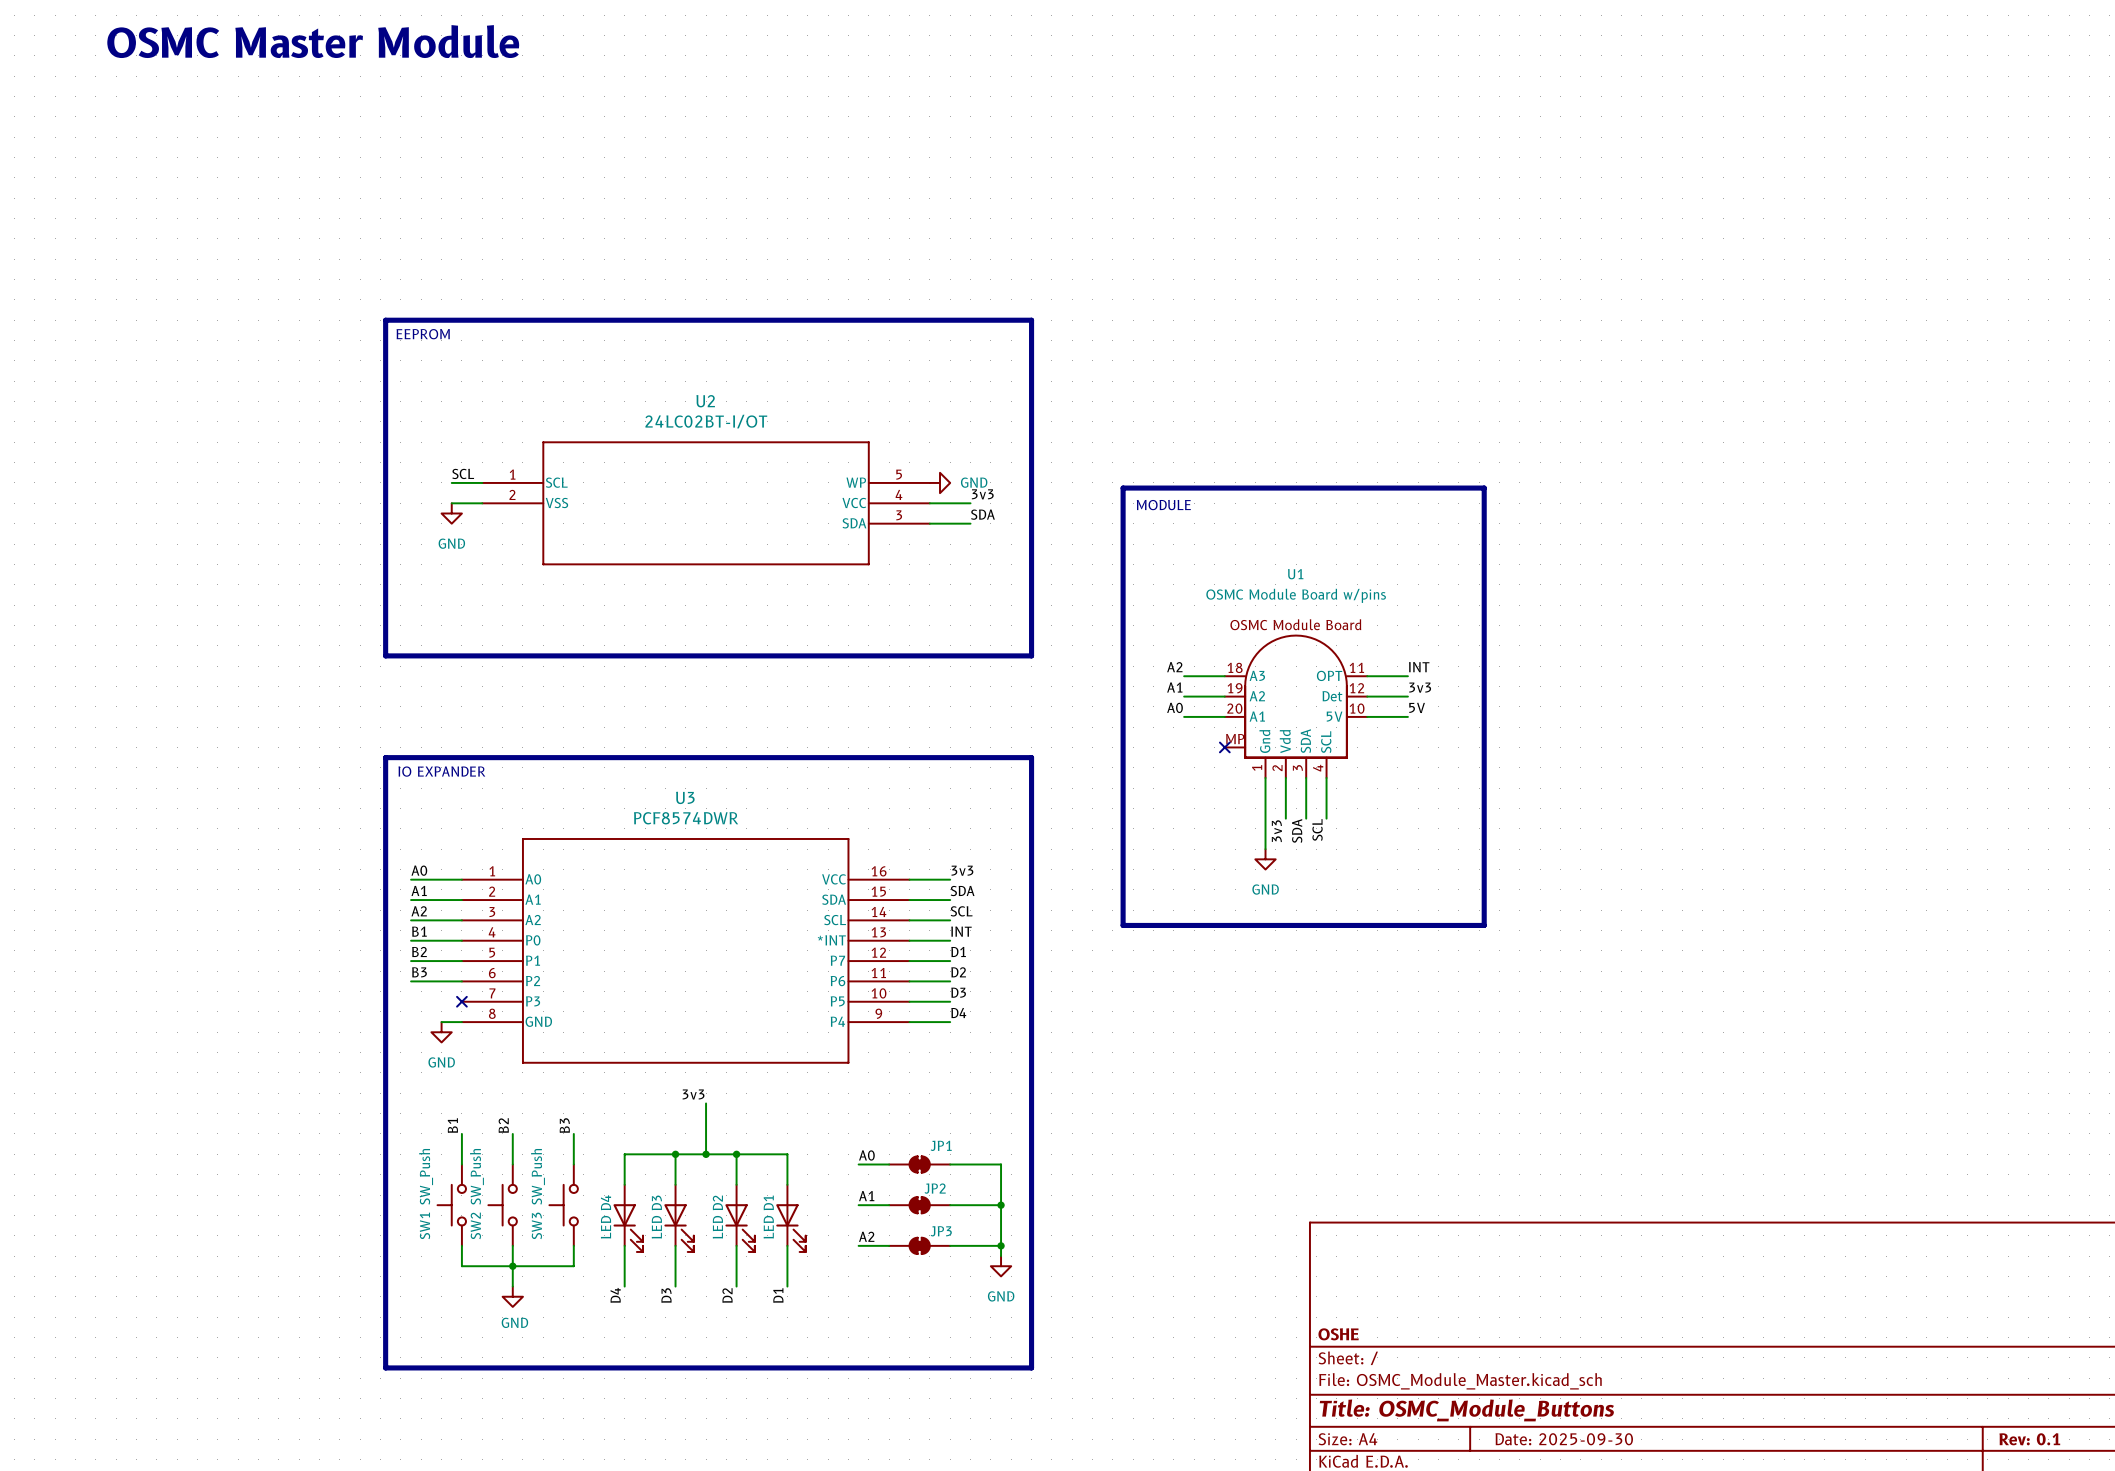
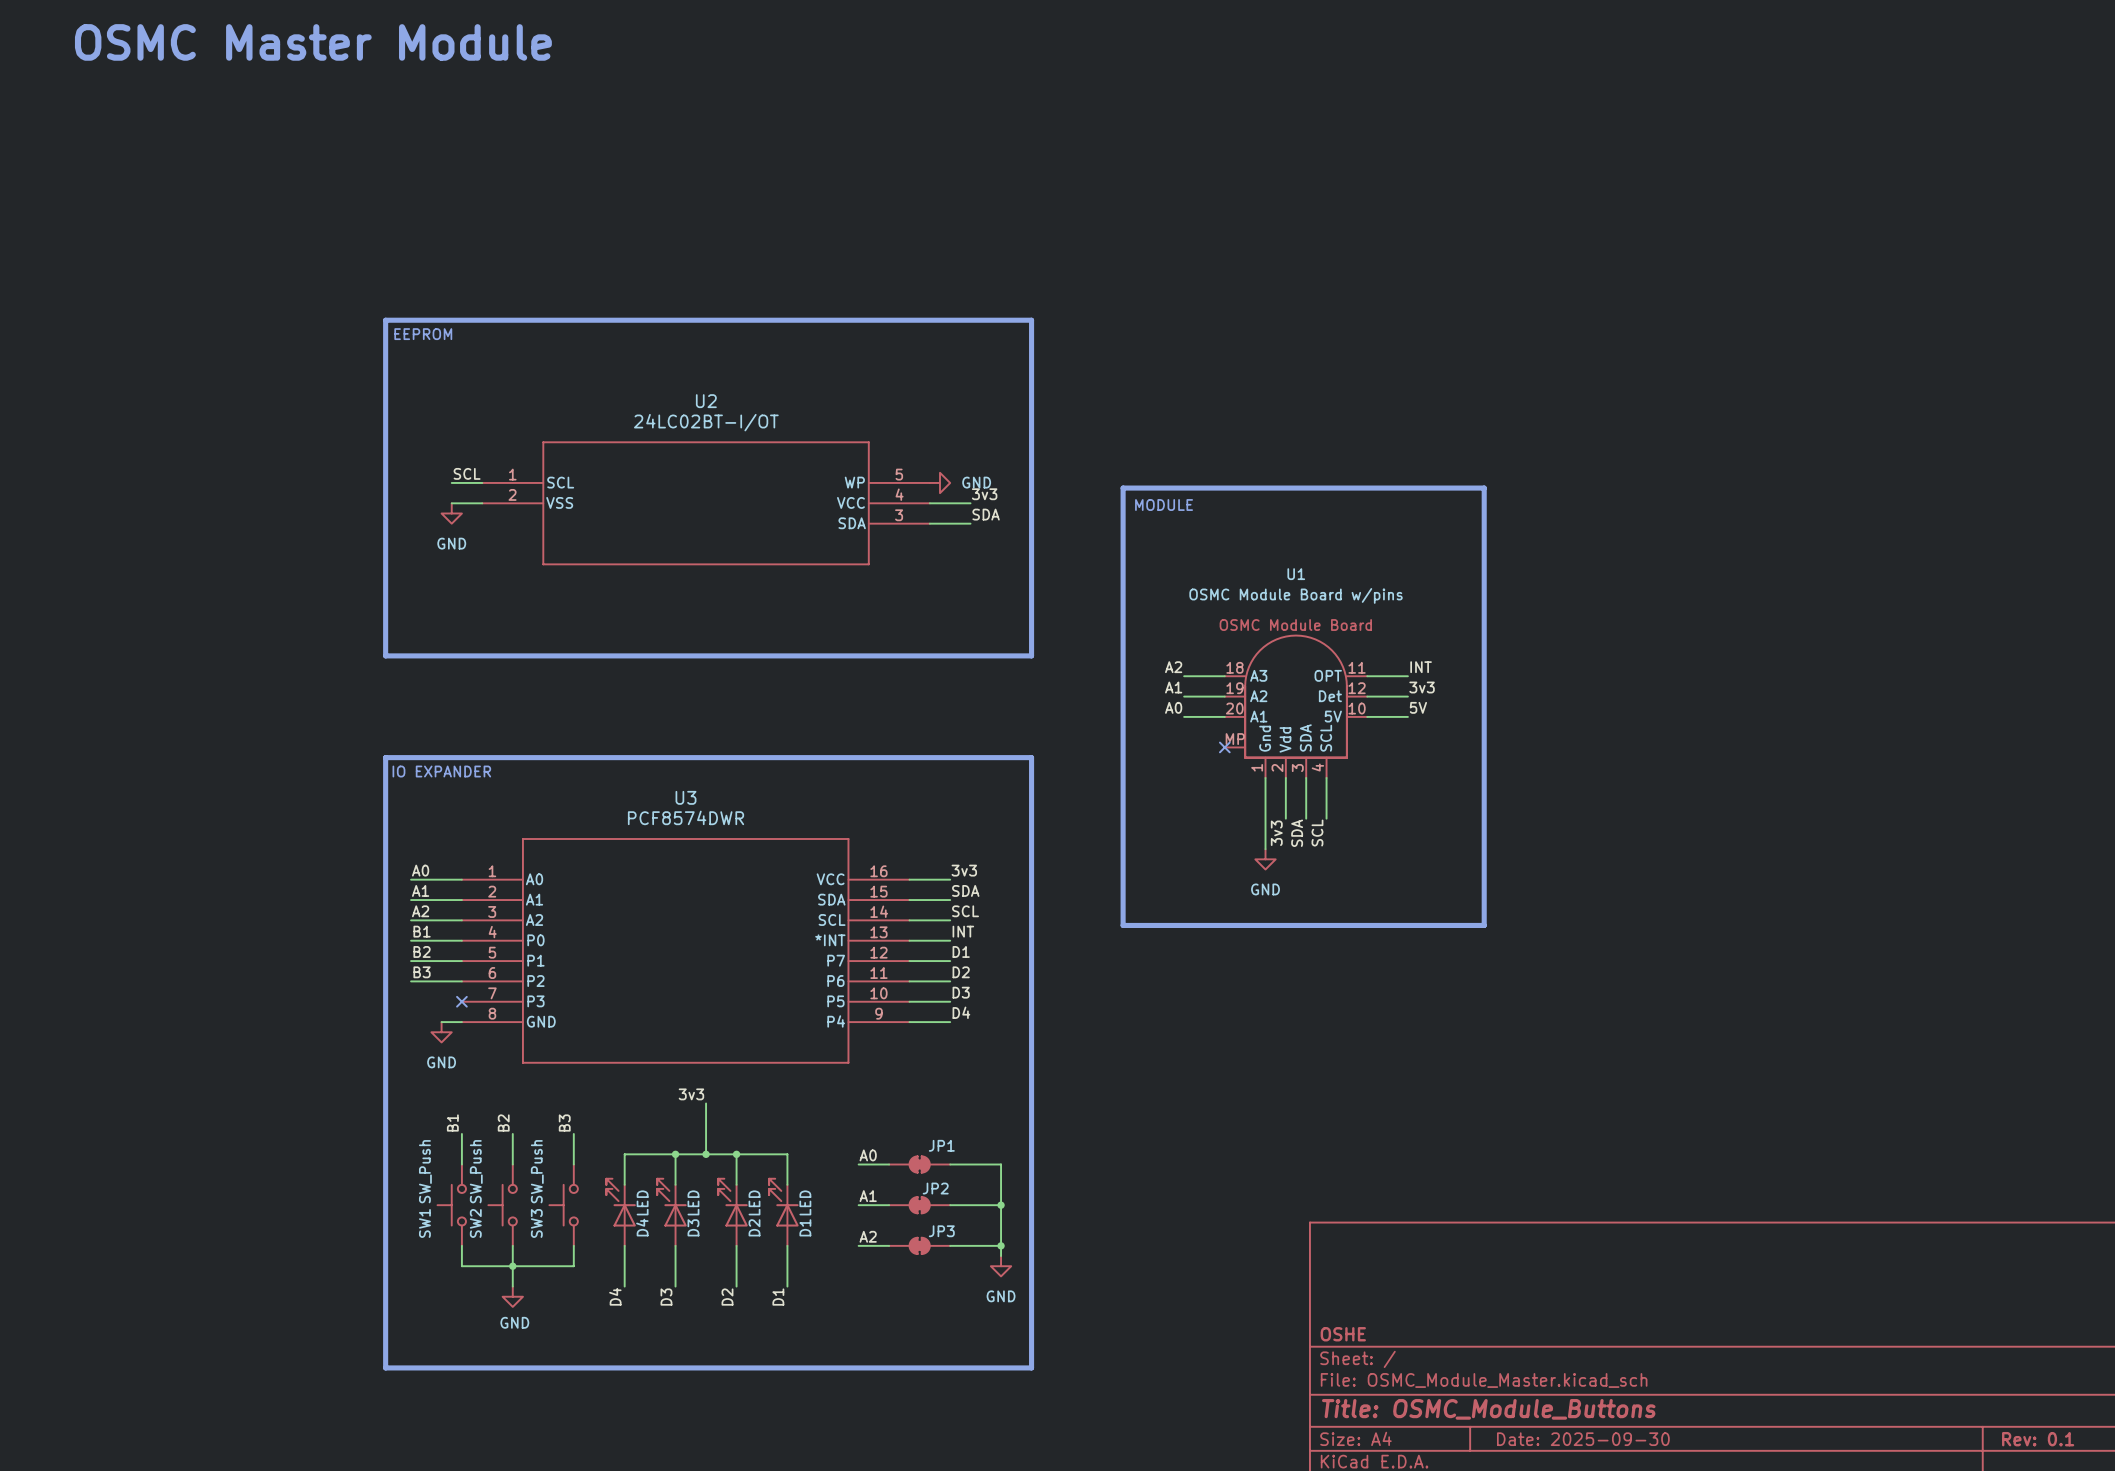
D4 rotation: 0° (628, 1228) -> 180° (621, 1202)
D3 rotation: 0° (679, 1228) -> 180° (671, 1202)
D2 rotation: 0° (740, 1228) -> 180° (733, 1202)
D1 rotation: 0° (790, 1228) -> 180° (783, 1202)

